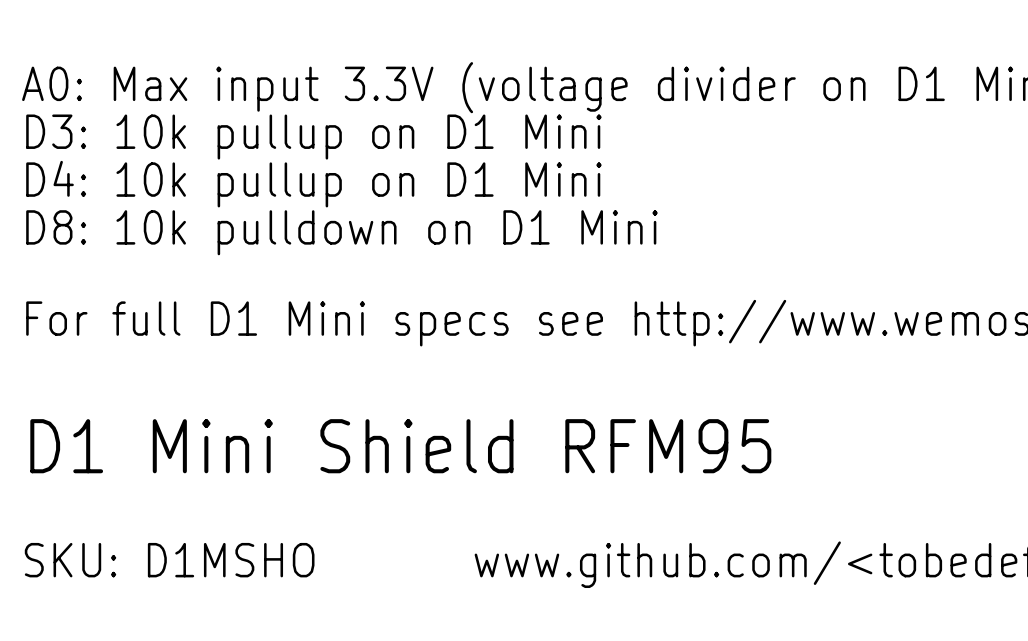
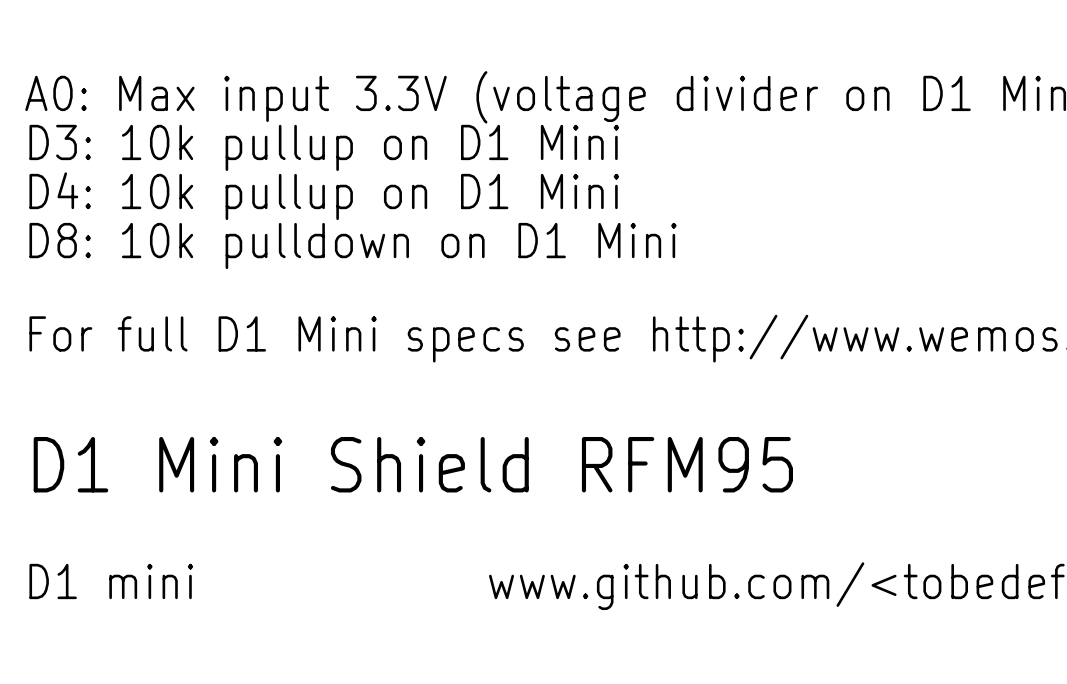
text: SKU: D1MSHO (169, 560) -> D1 mini (111, 581)

